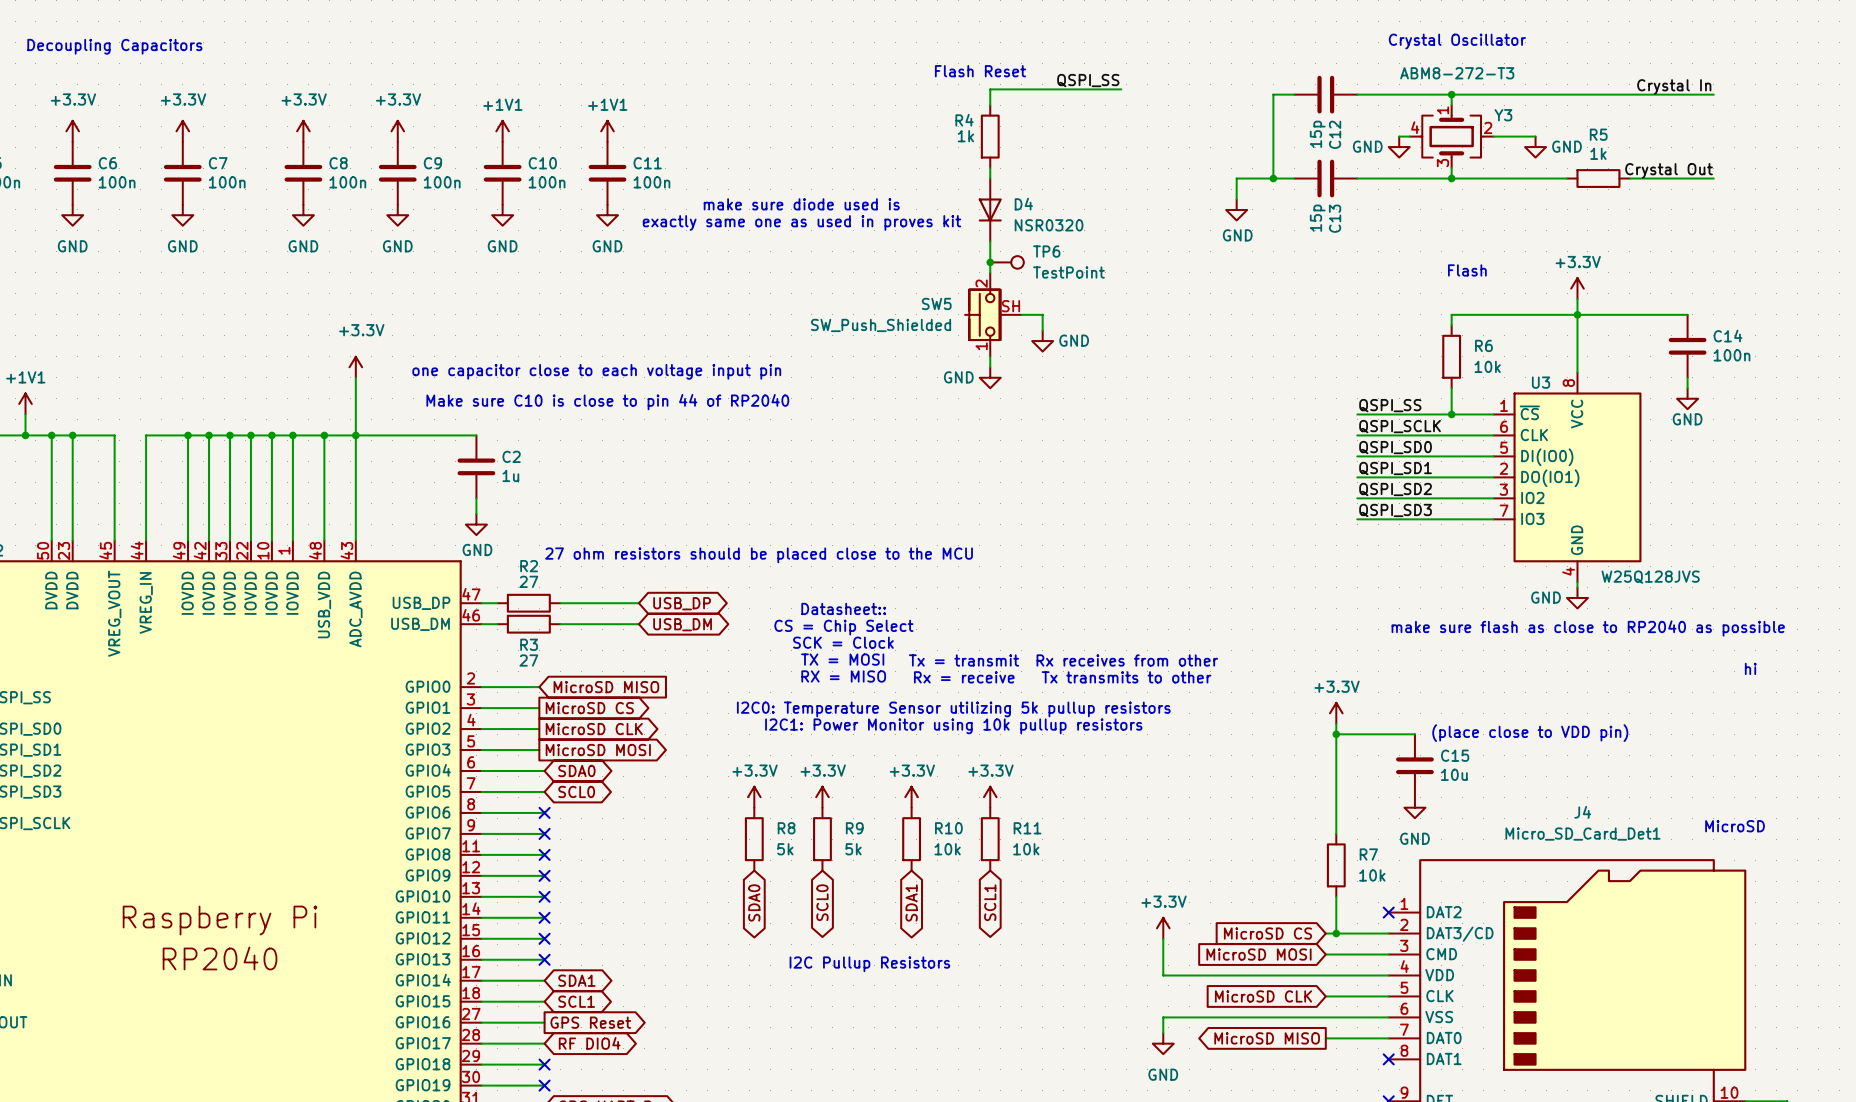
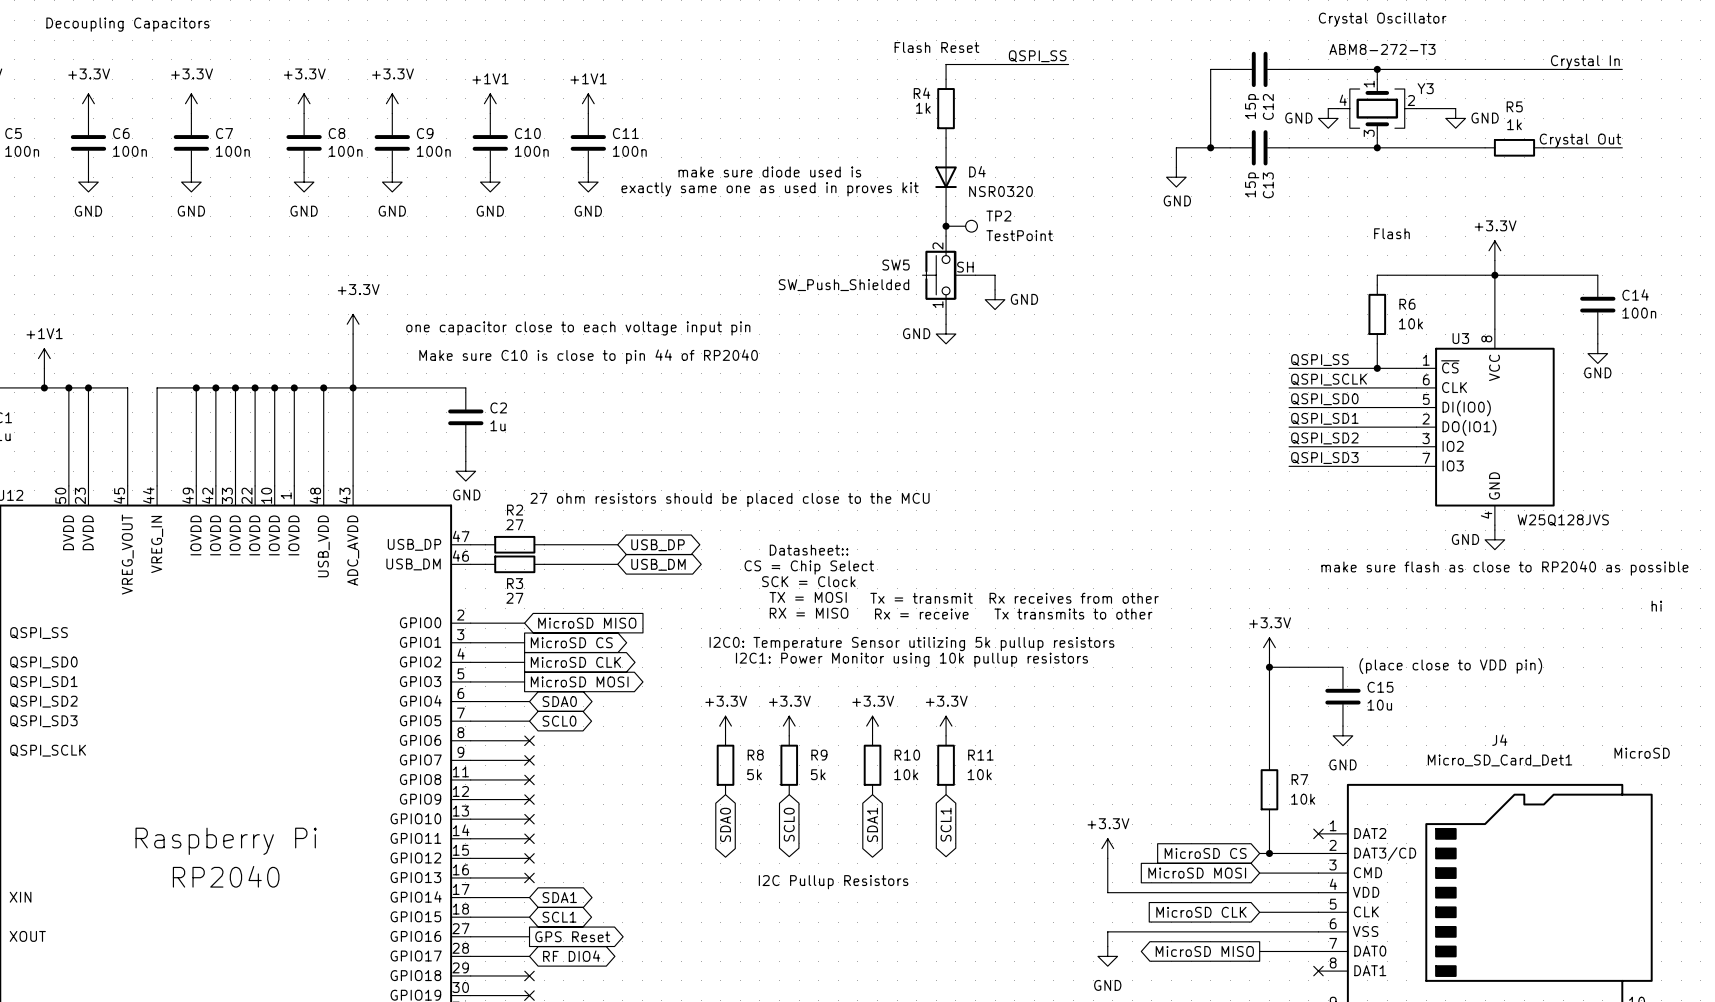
TP6 name: TP6 (1046, 251) -> TP2 (998, 216)

